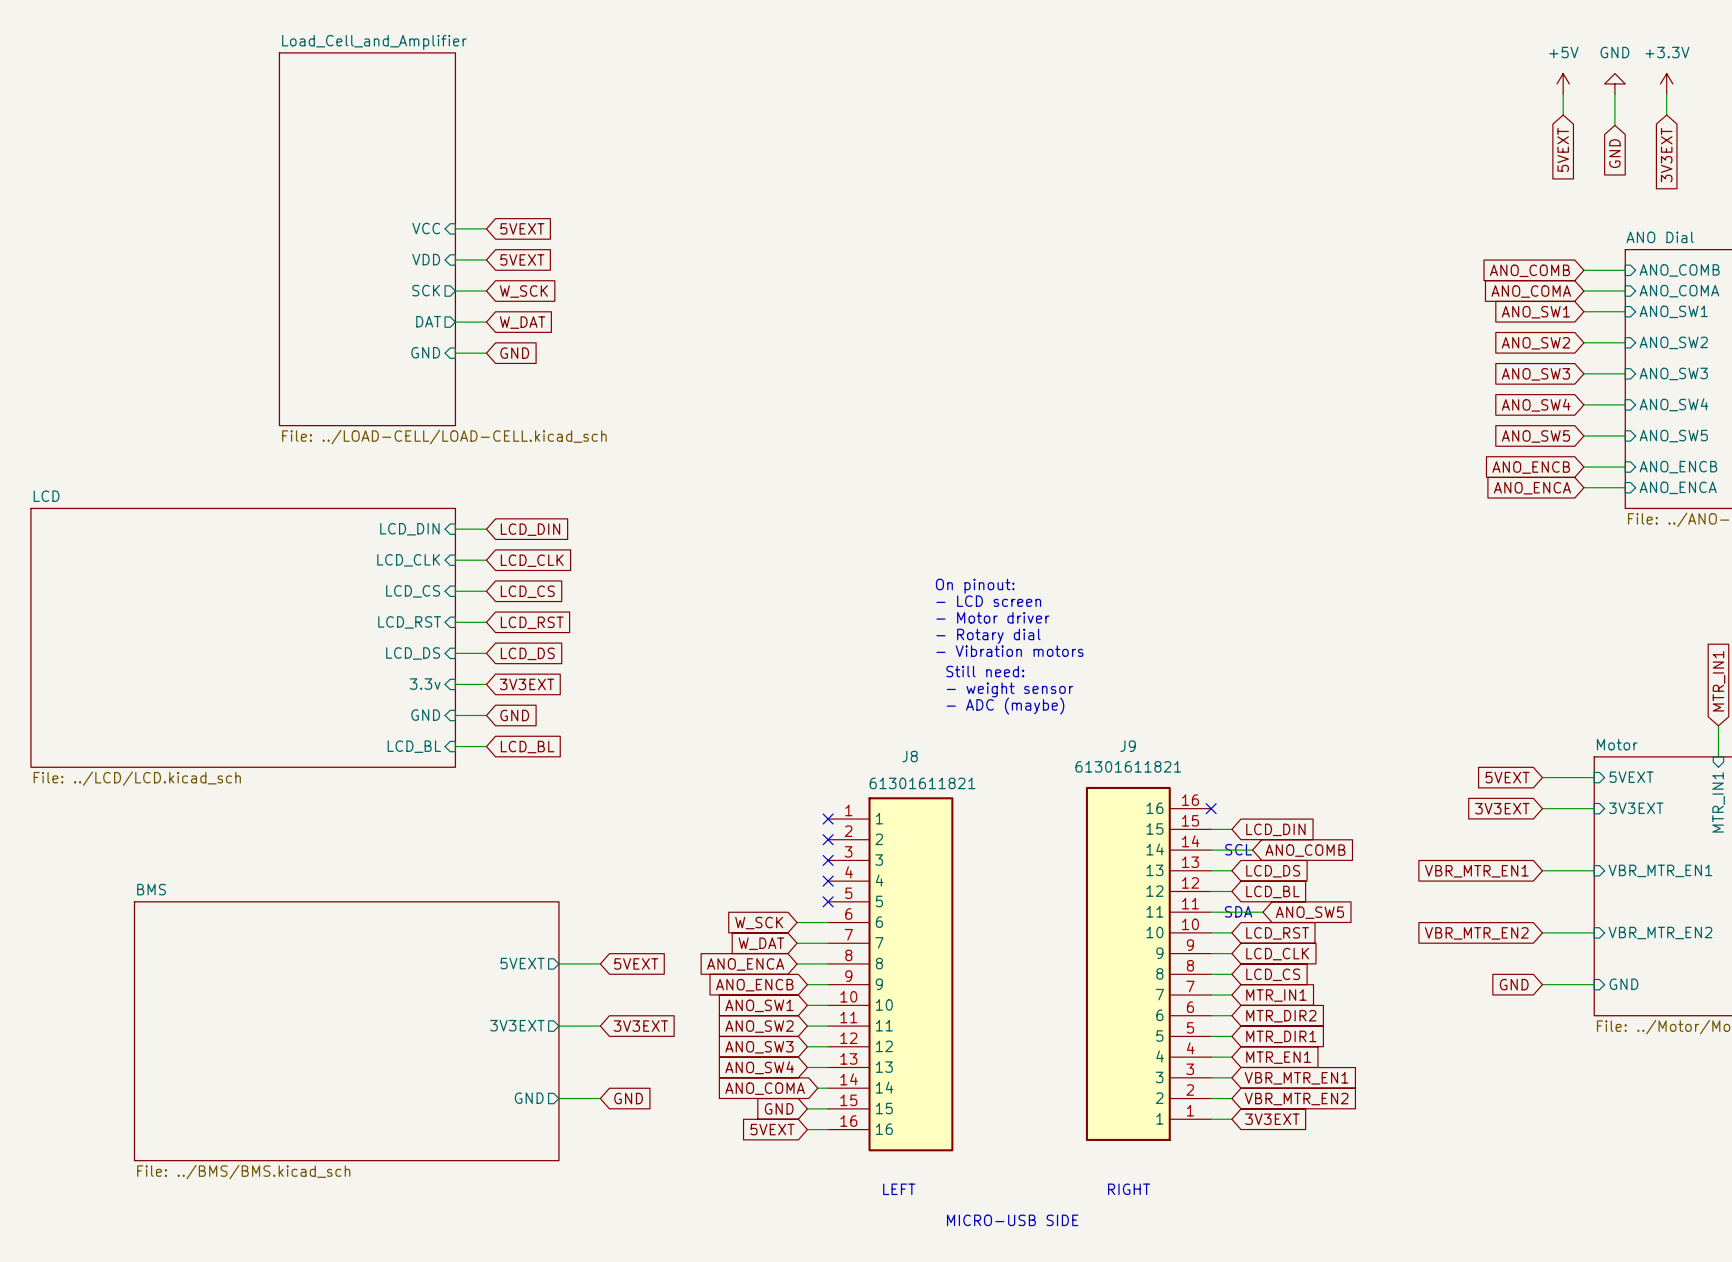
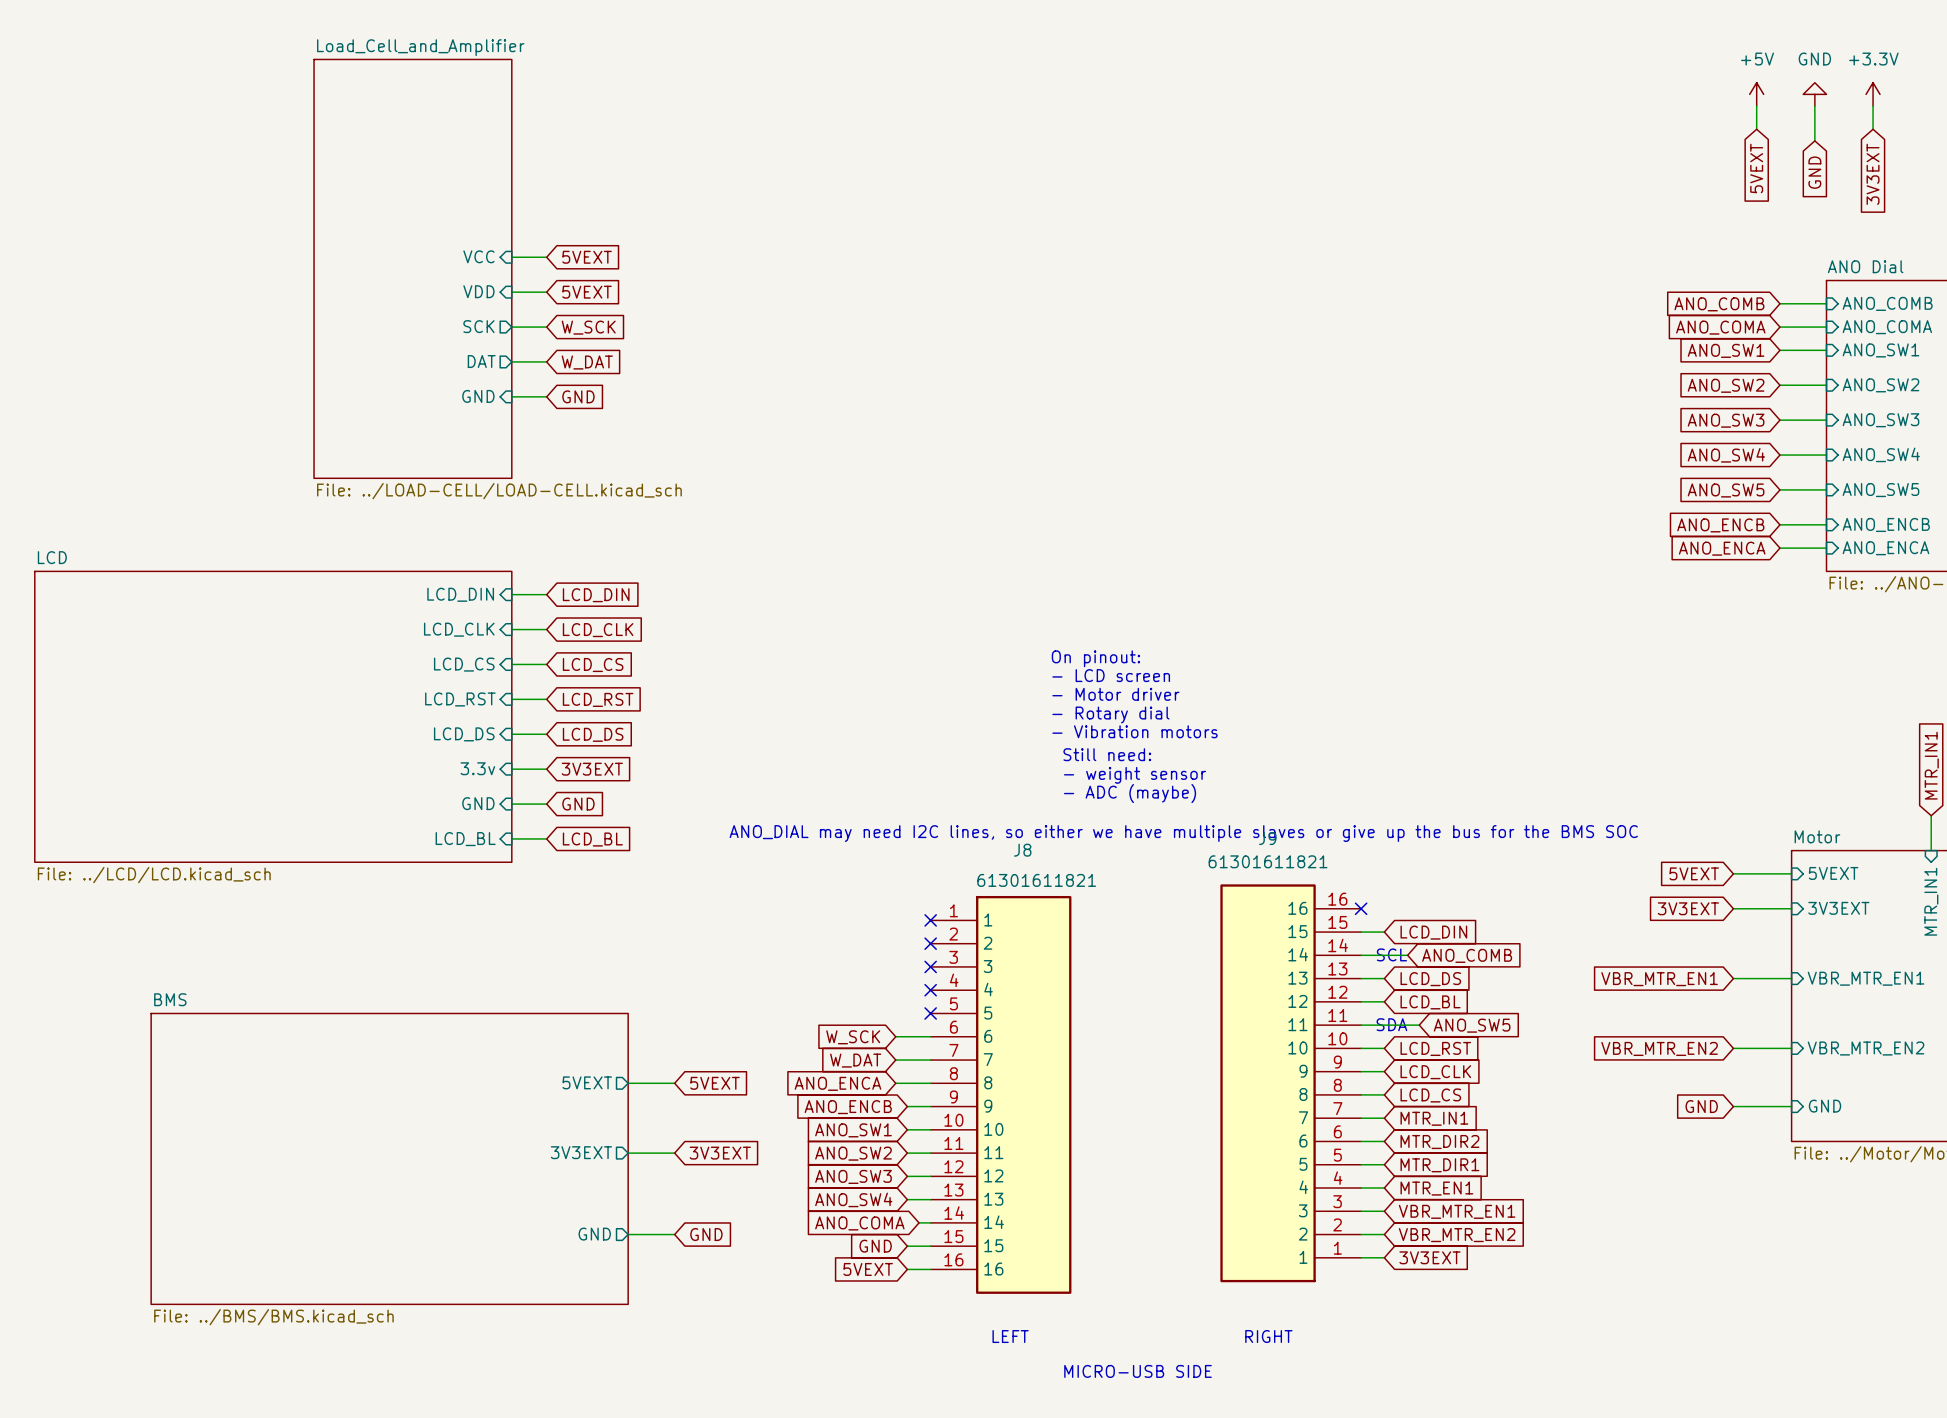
text: none -> ANO_DIAL may need I2C lines, so either we have multiple slaves or give up the bus for the BMS SOC (1183, 833)

